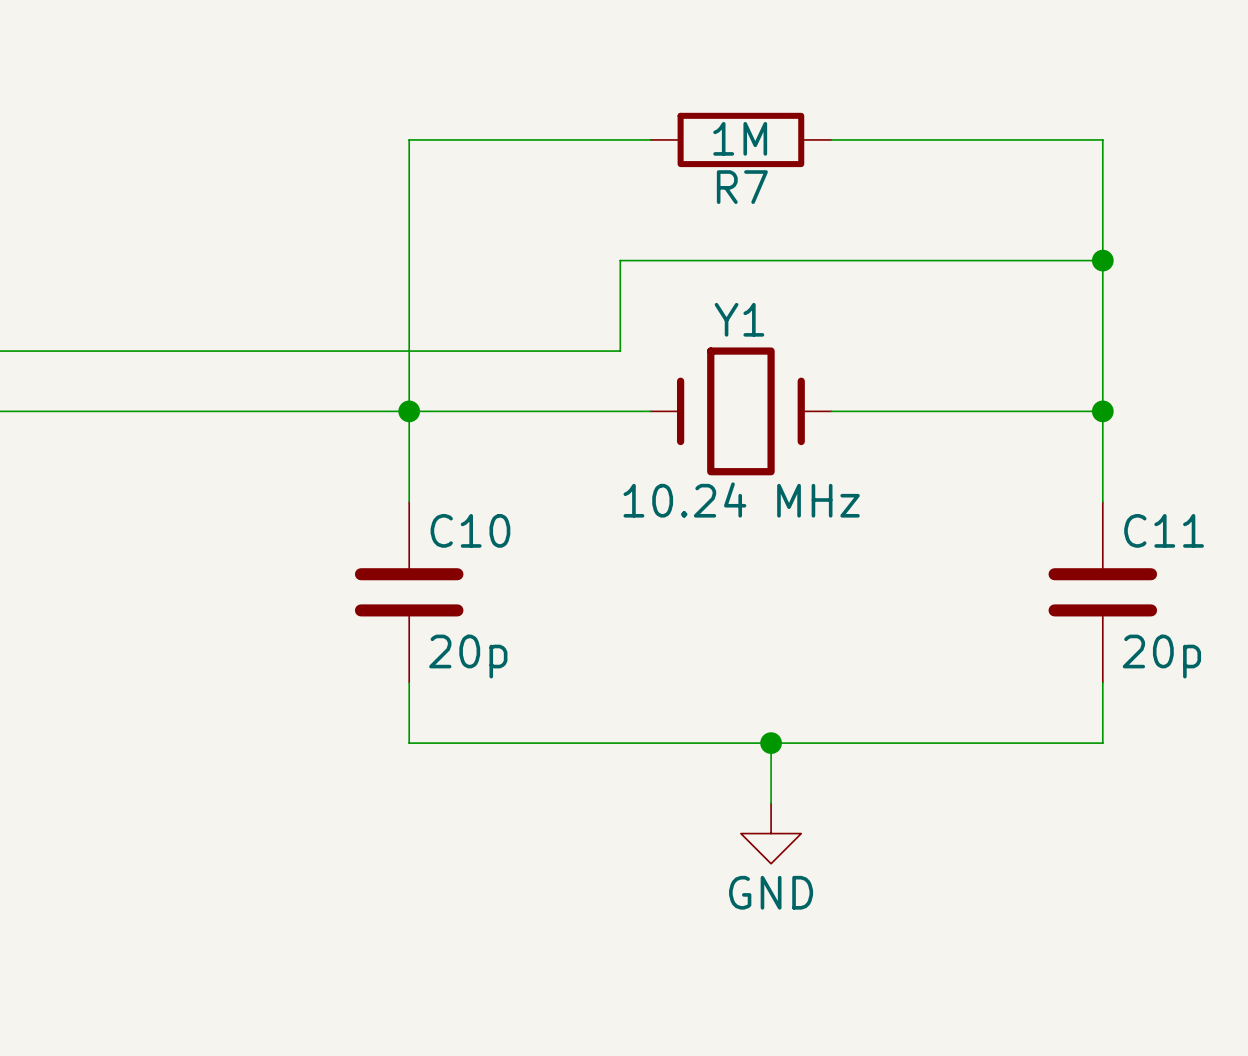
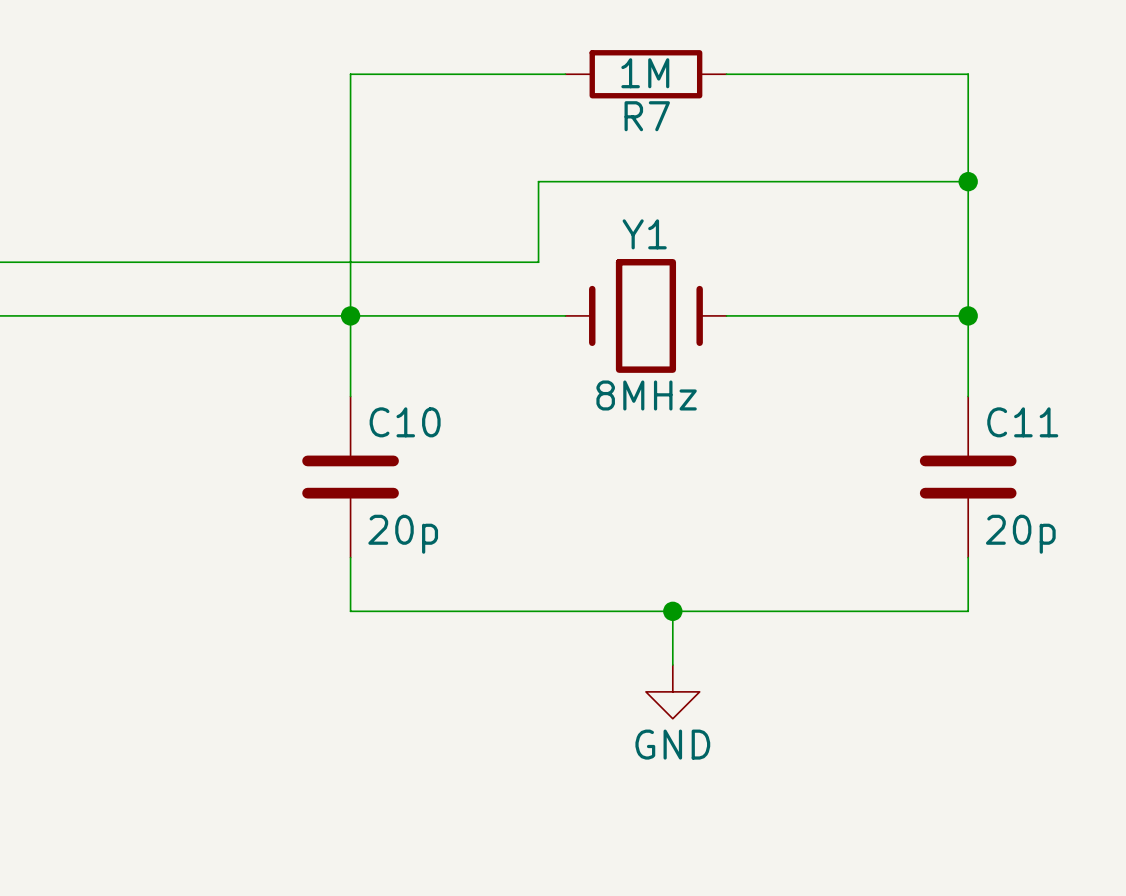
Y1 value: 10.24 MHz (741, 500) -> 8MHz (646, 395)

